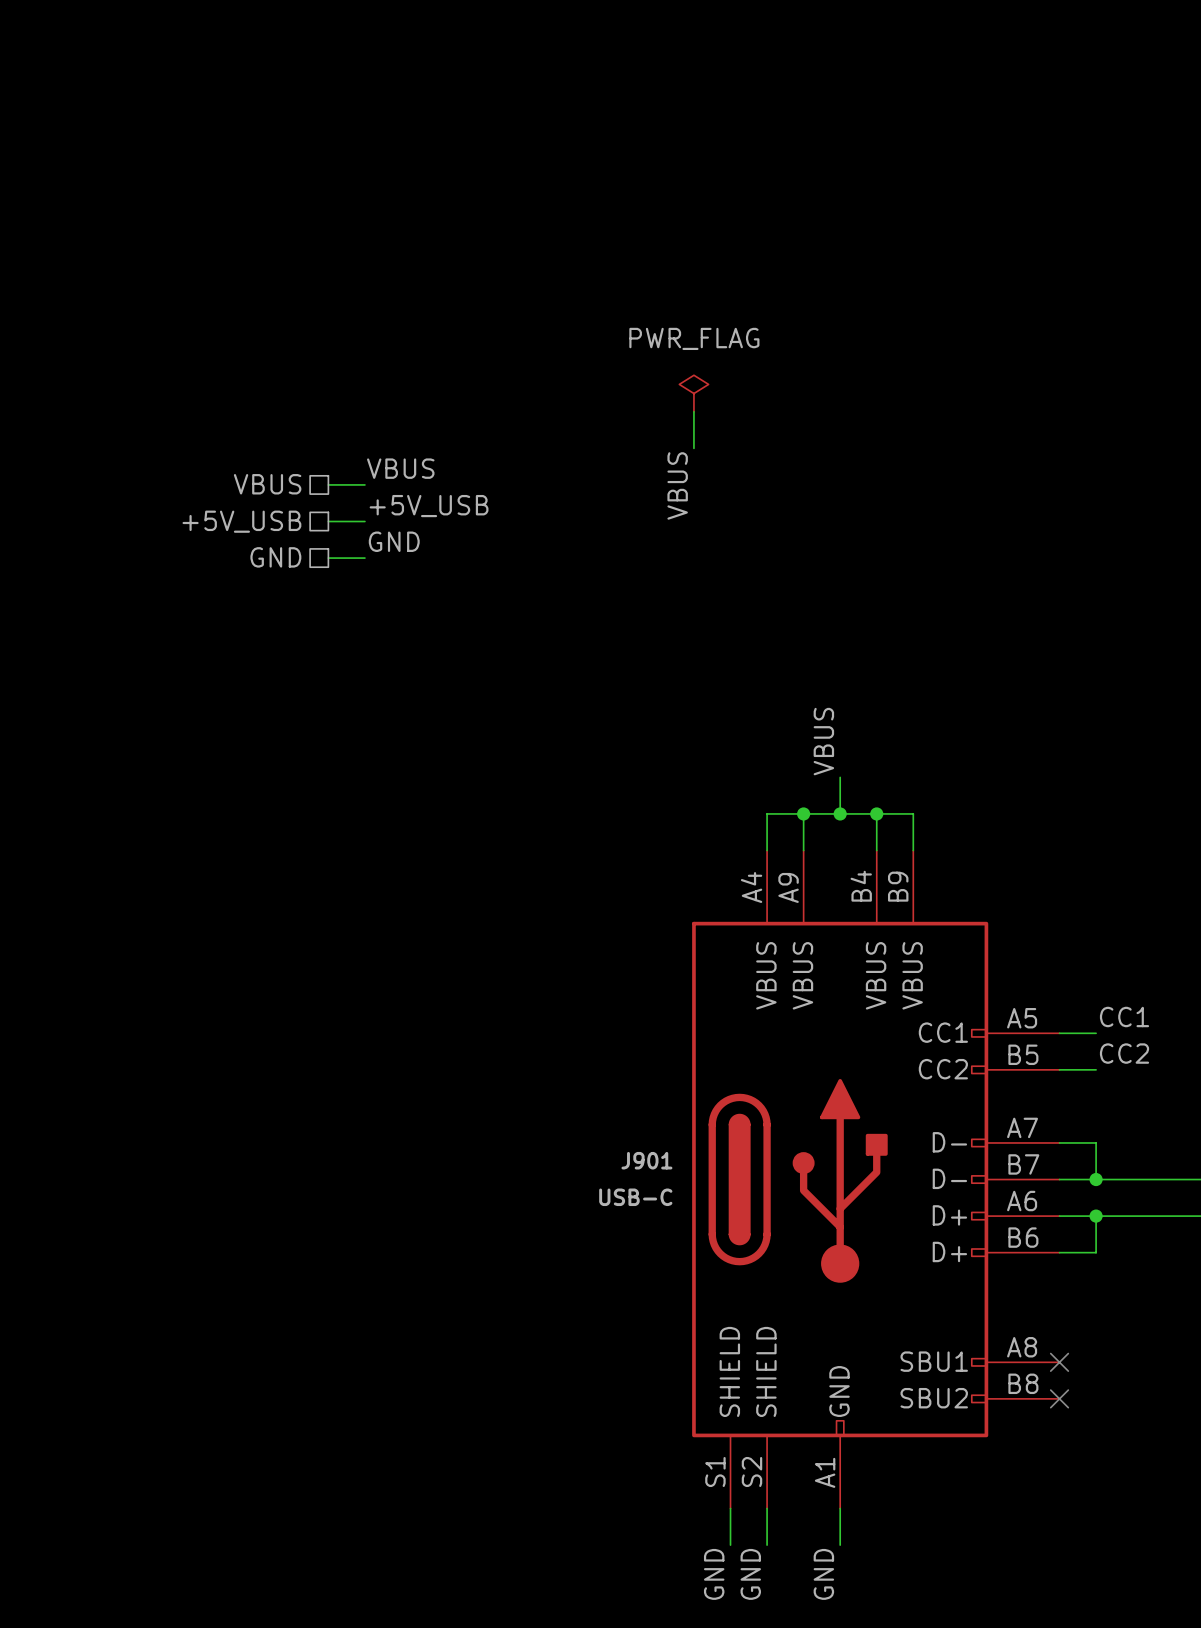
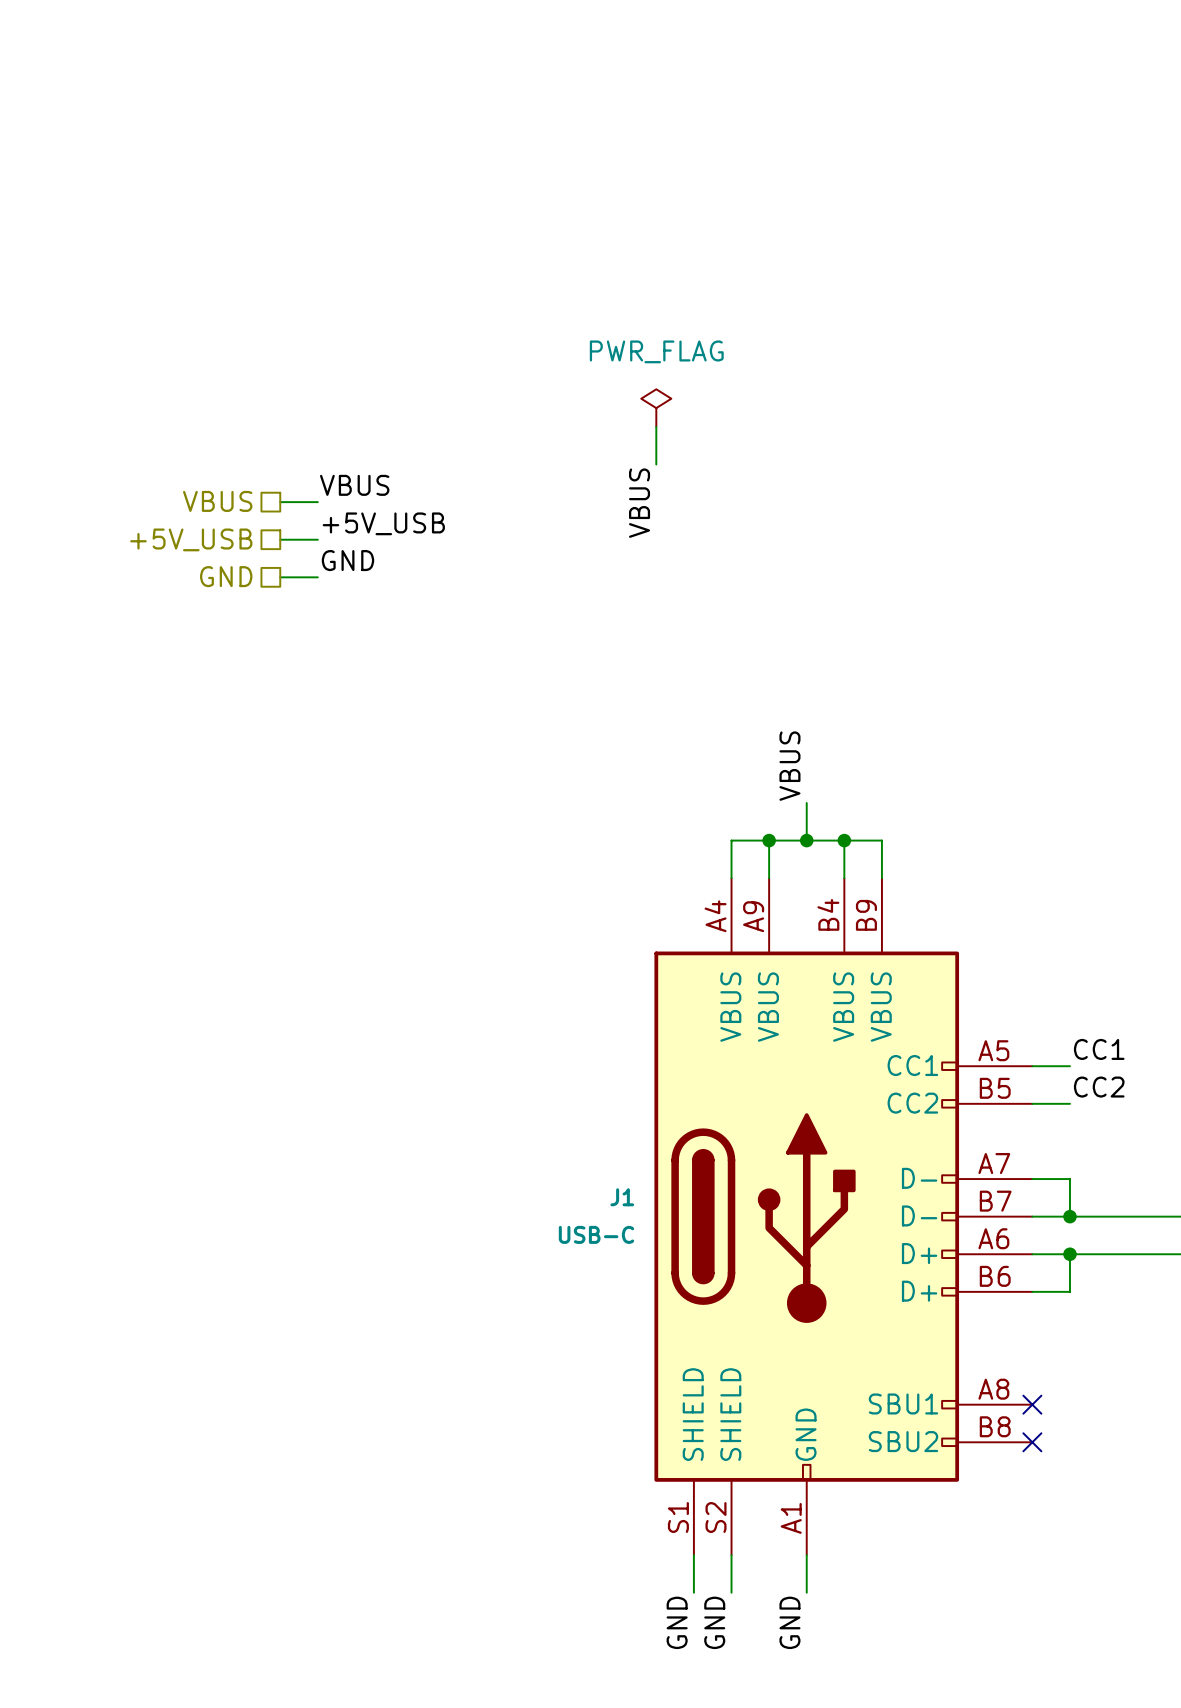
J901 name: J901 (646, 1160) -> J1 (622, 1197)

